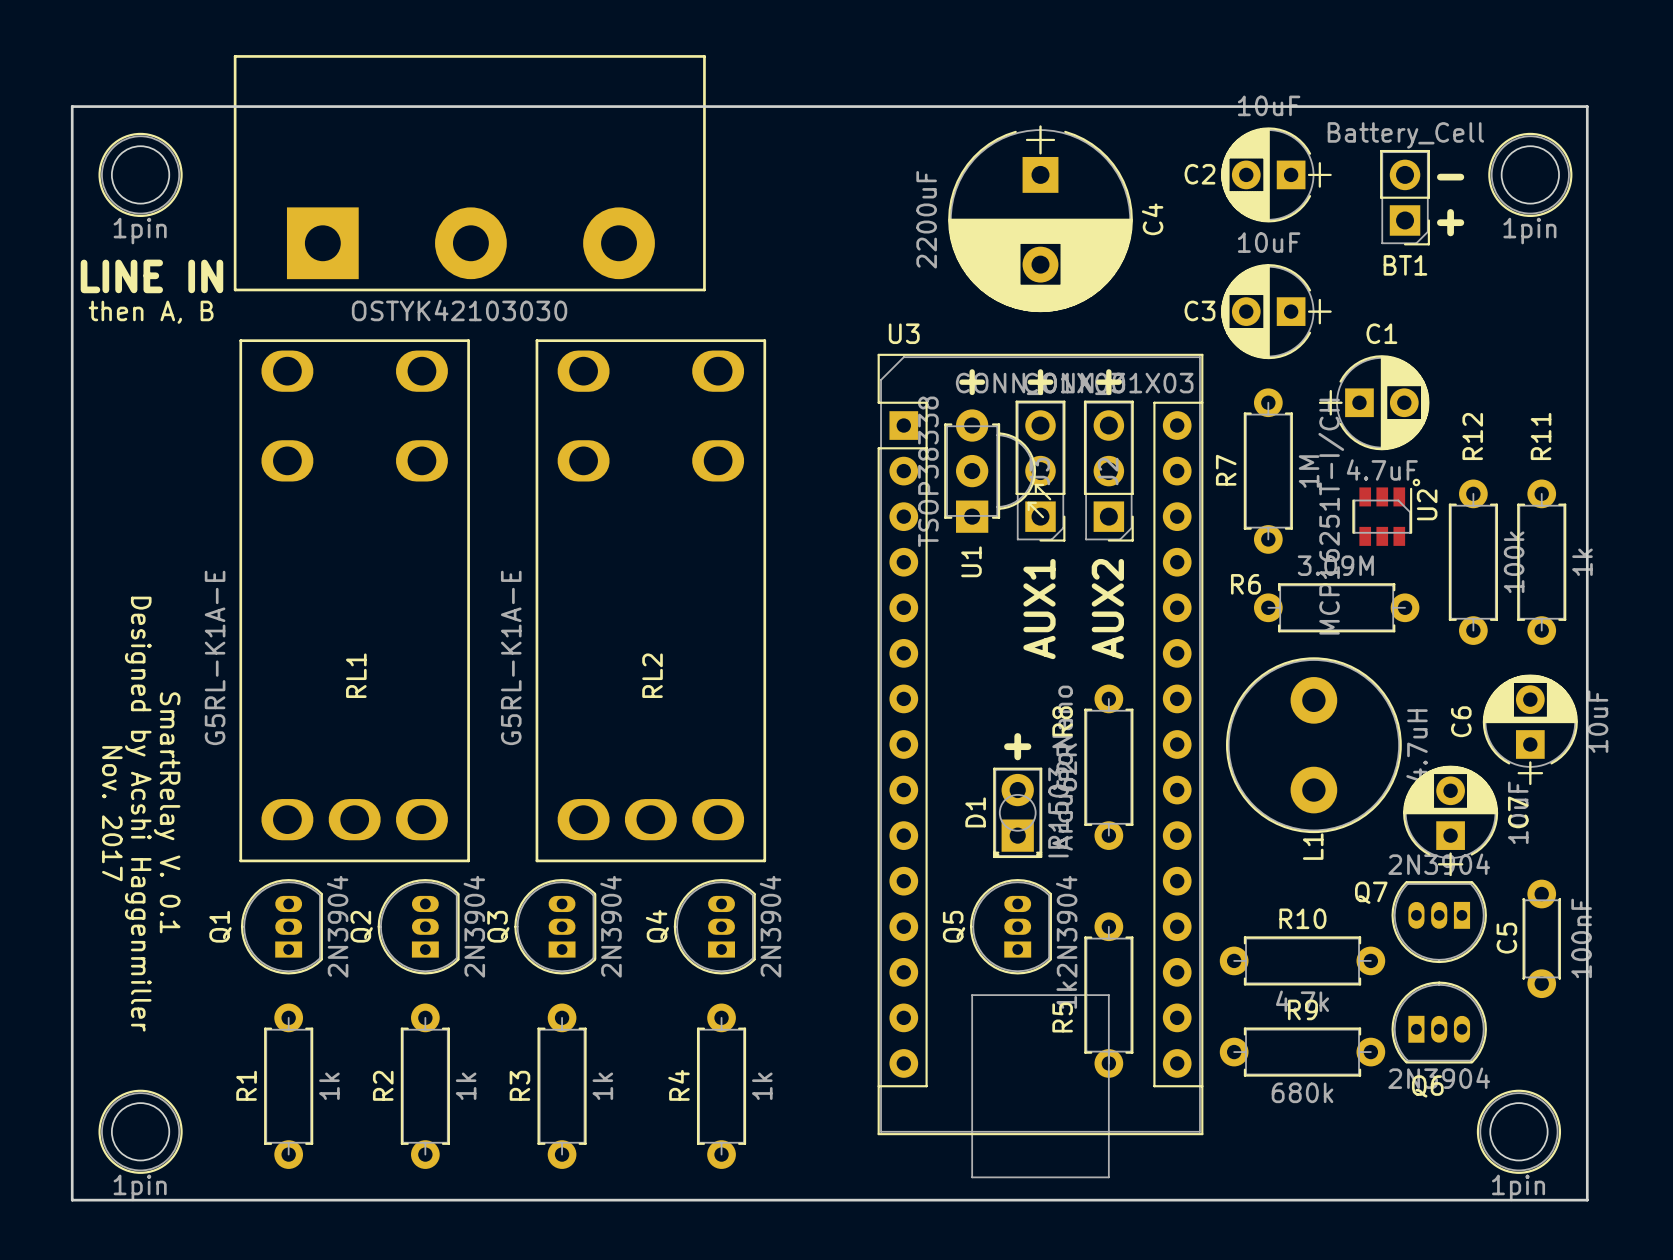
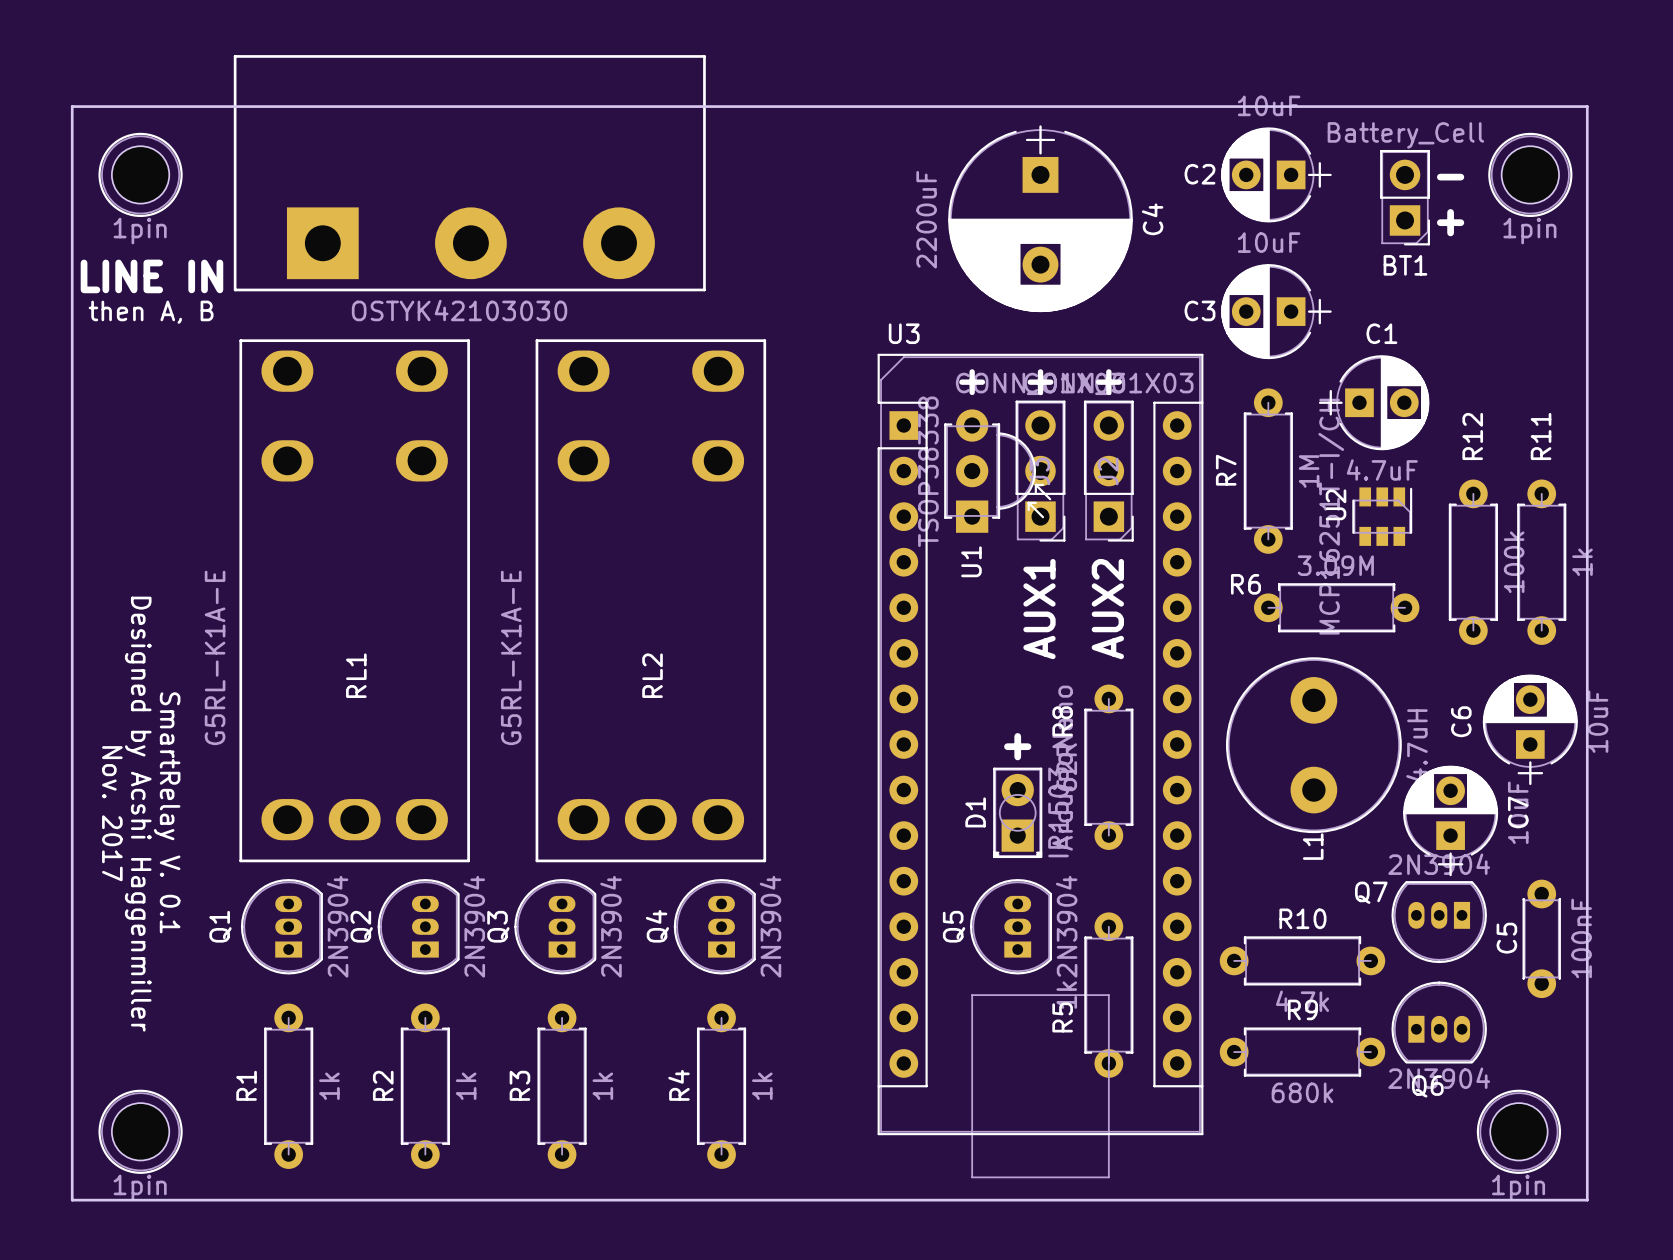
drawing: [1412, 478, 1421, 487] -> none
U2 name position: U2 (1427, 504) -> U2 (1336, 504)

